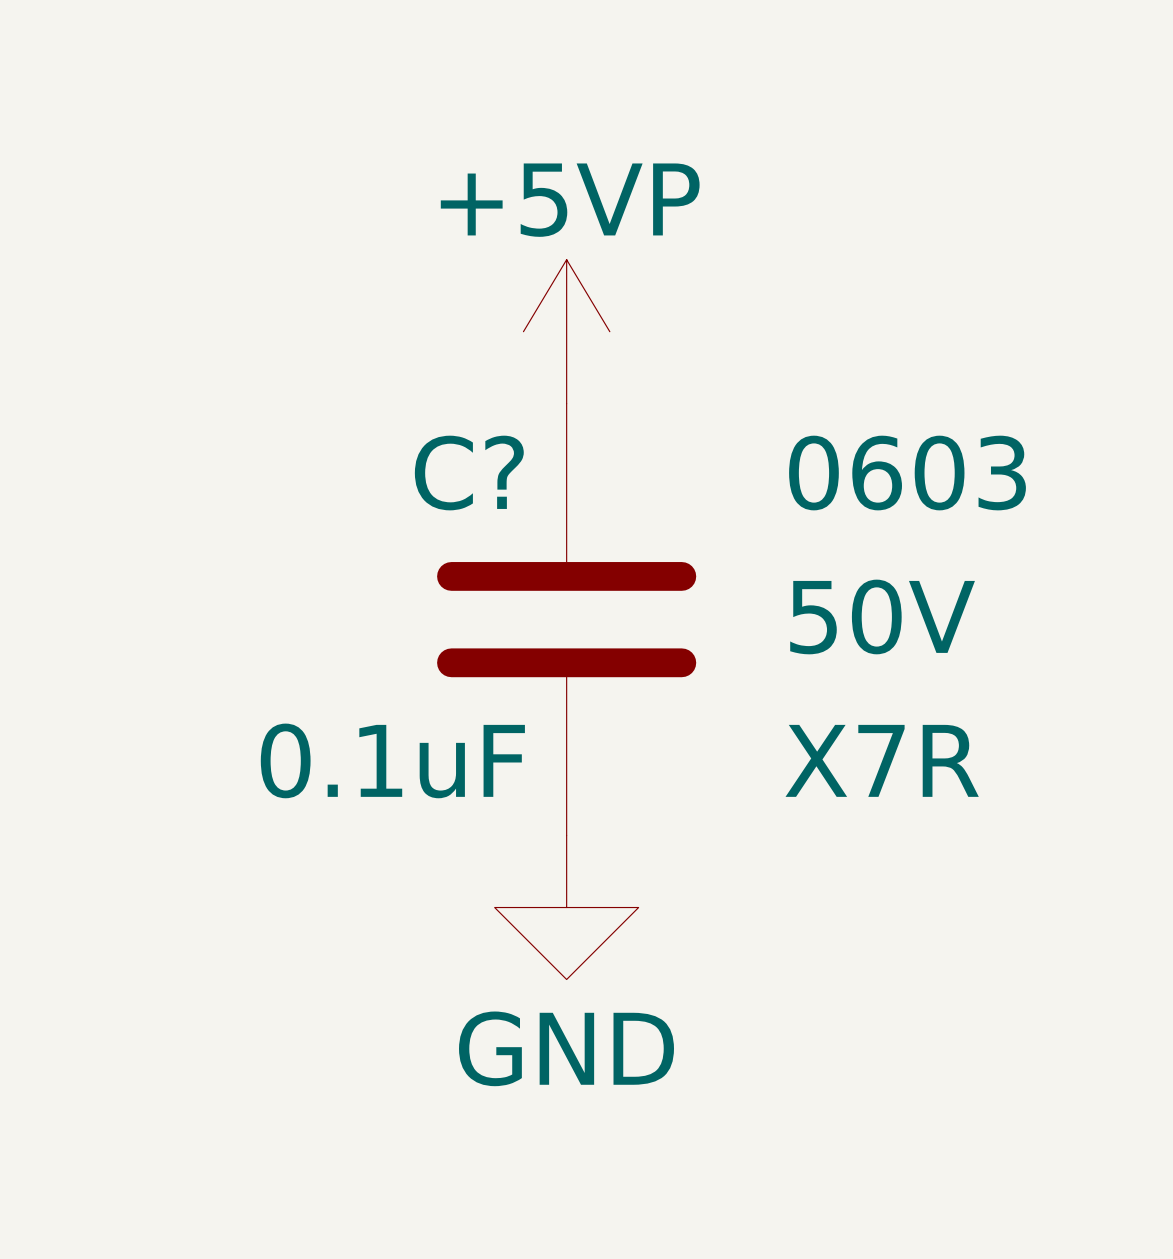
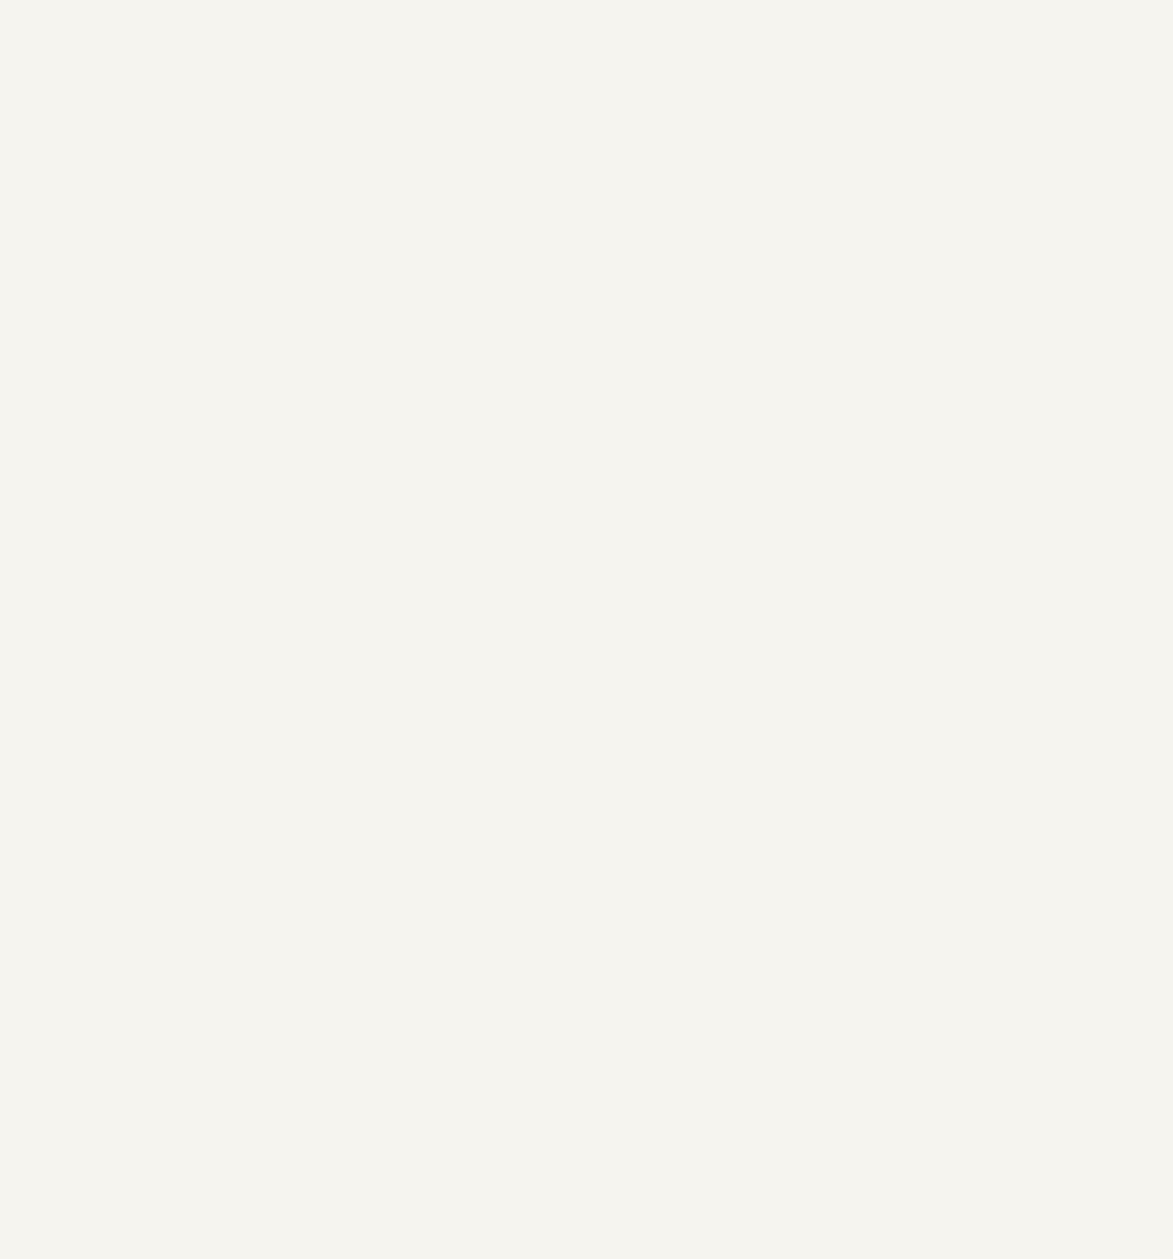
power symbol: +5VP (566, 331) -> none
C?: 0.1uF (566, 619) -> none
power symbol: GND (566, 907) -> none

